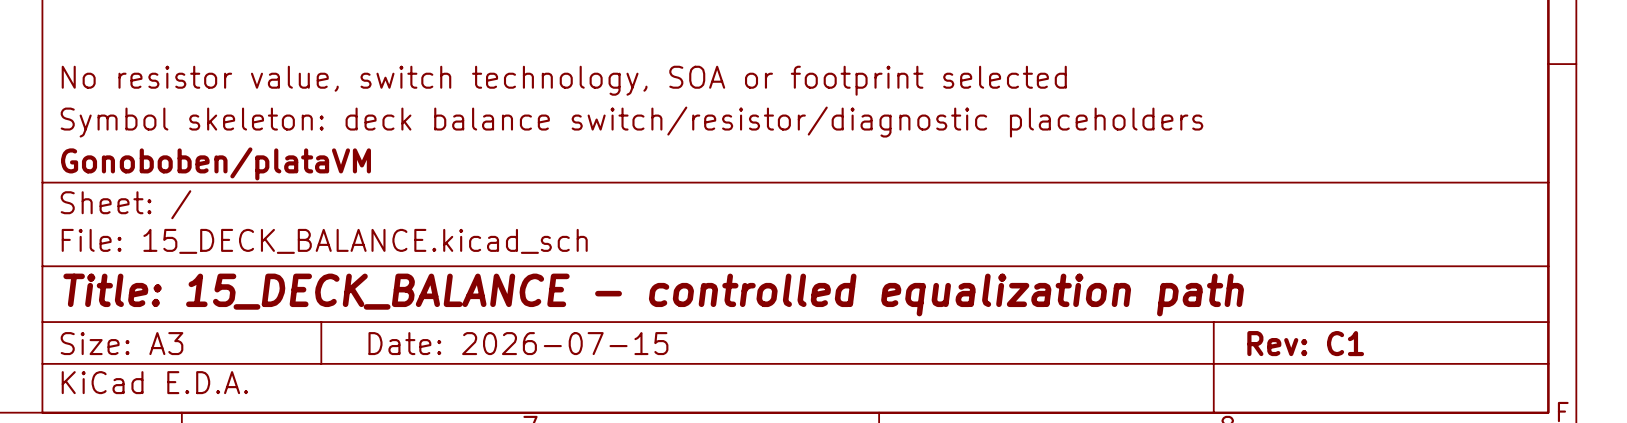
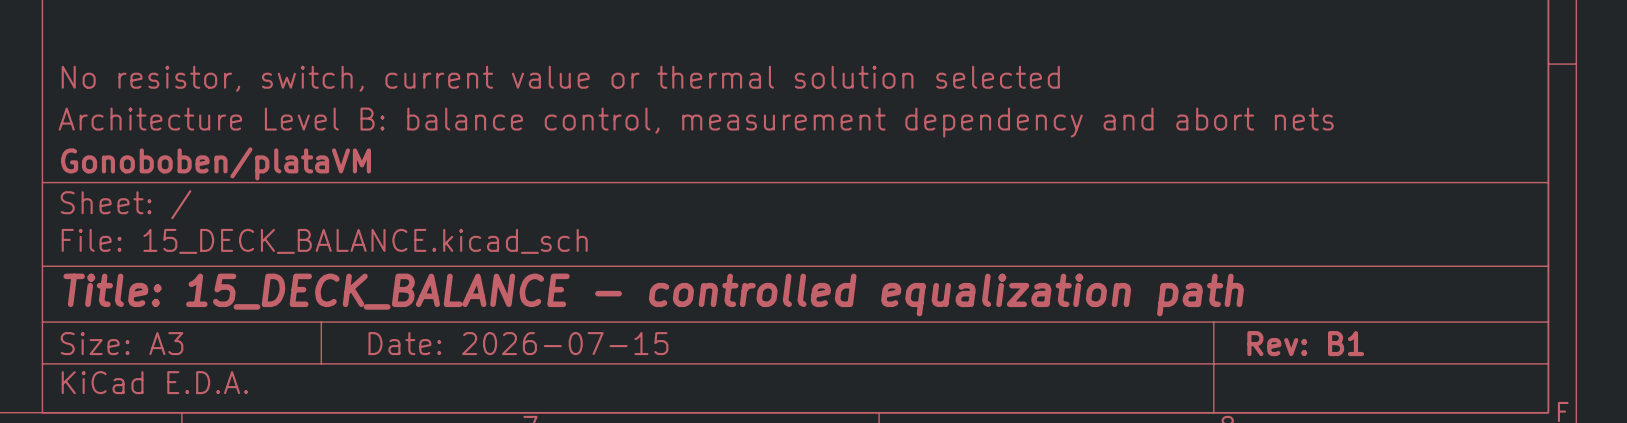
title block: No resistor value, switch technology, SOA or footprint selected (564, 80) -> No resistor, switch, current value or thermal solution selected (560, 78)
title block: Symbol skeleton: deck balance switch/resistor/diagnostic placeholders (631, 122) -> Architecture Level B: balance control, measurement dependency and abort nets (696, 122)
title block: Rev: C1 (1305, 343) -> Rev: B1 (1305, 343)

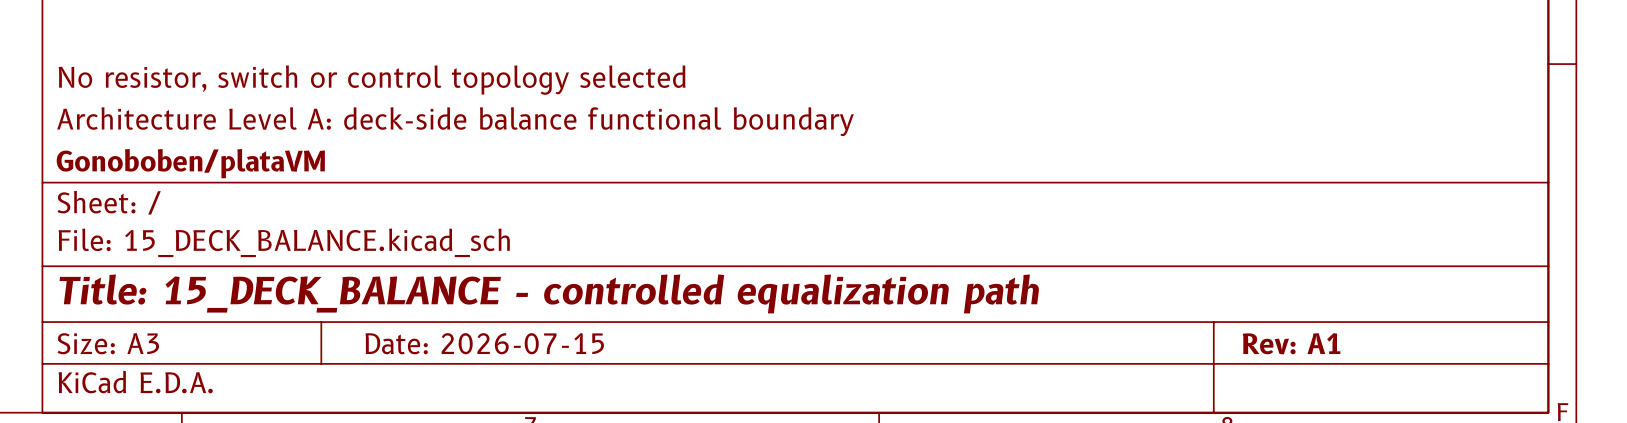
title block: No resistor, switch, current value or thermal solution selected (560, 78) -> No resistor, switch or control topology selected (372, 80)
title block: Architecture Level B: balance control, measurement dependency and abort nets (696, 122) -> Architecture Level A: deck-side balance functional boundary (455, 121)
title block: Rev: B1 (1305, 343) -> Rev: A1 (1291, 343)

